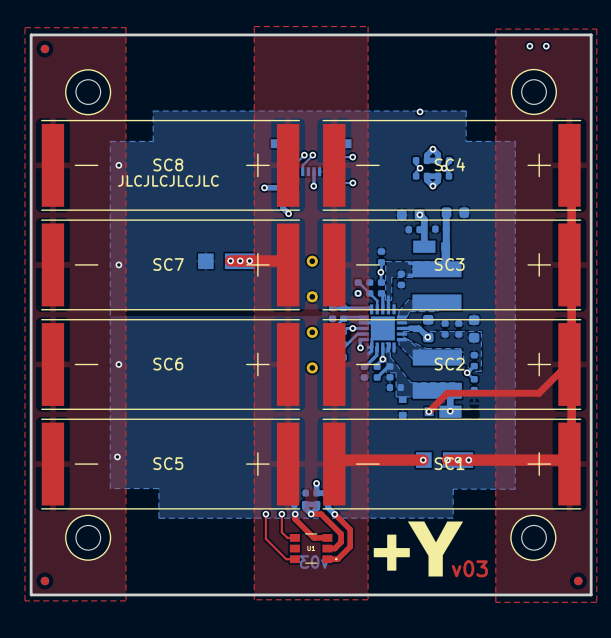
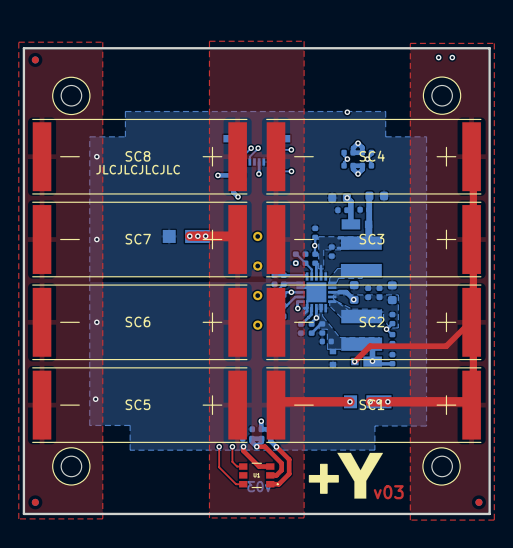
part: none -> (392, 359)
bottom track: none -> (373, 363) (390, 363)

